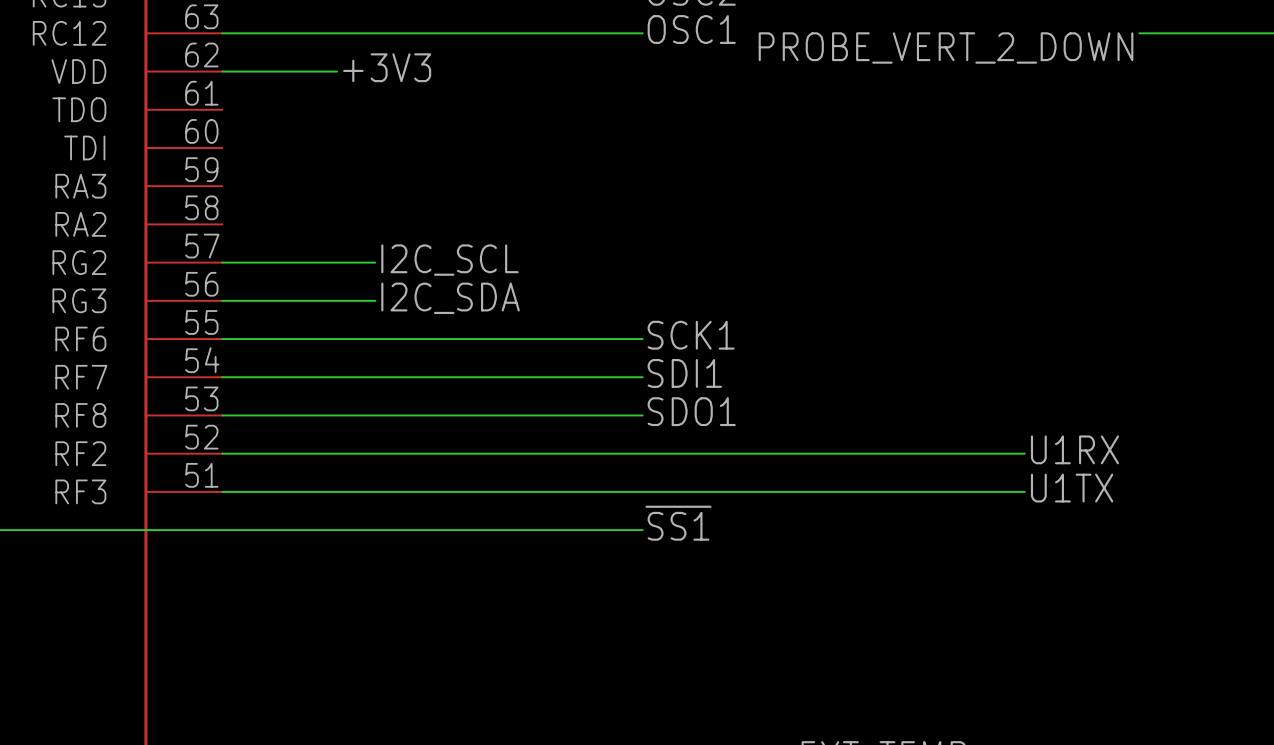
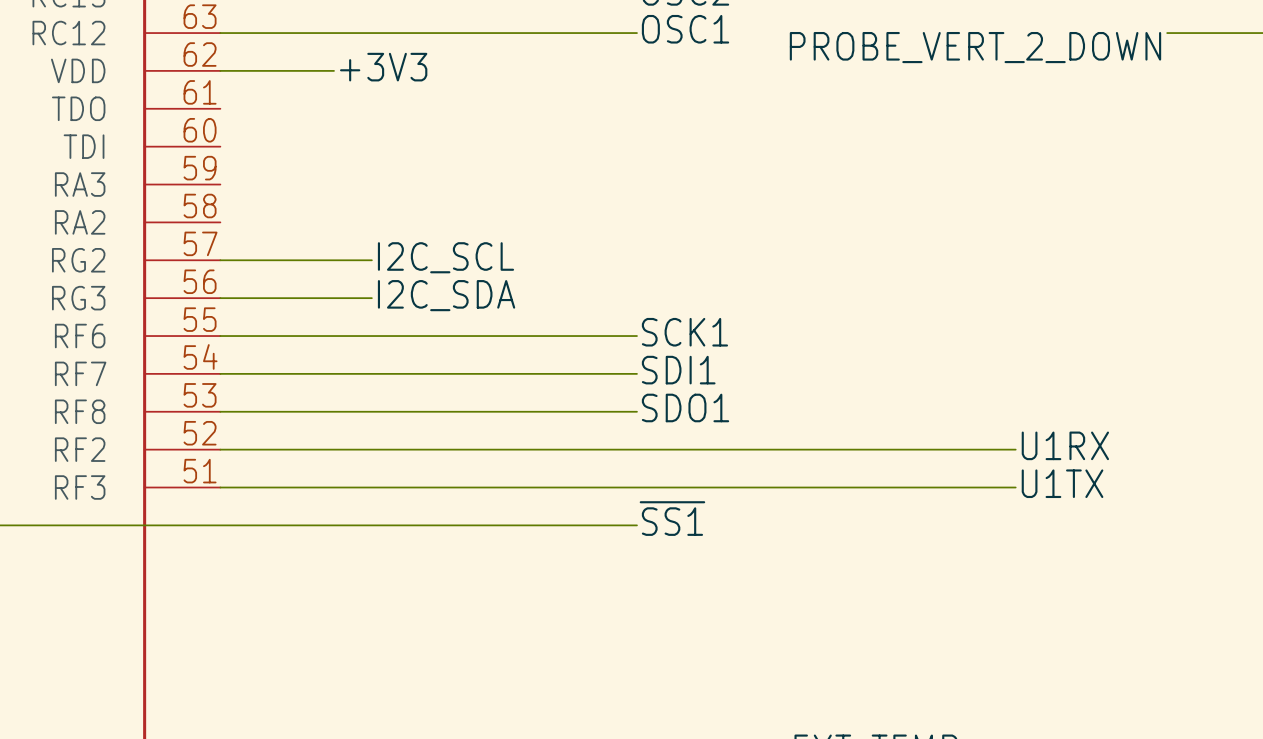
wire: (1139, 33) (1177, 33) -> none
label position: PROBE_VERT_2_DOWN (946, 47) -> PROBE_VERT_2_DOWN (975, 47)

